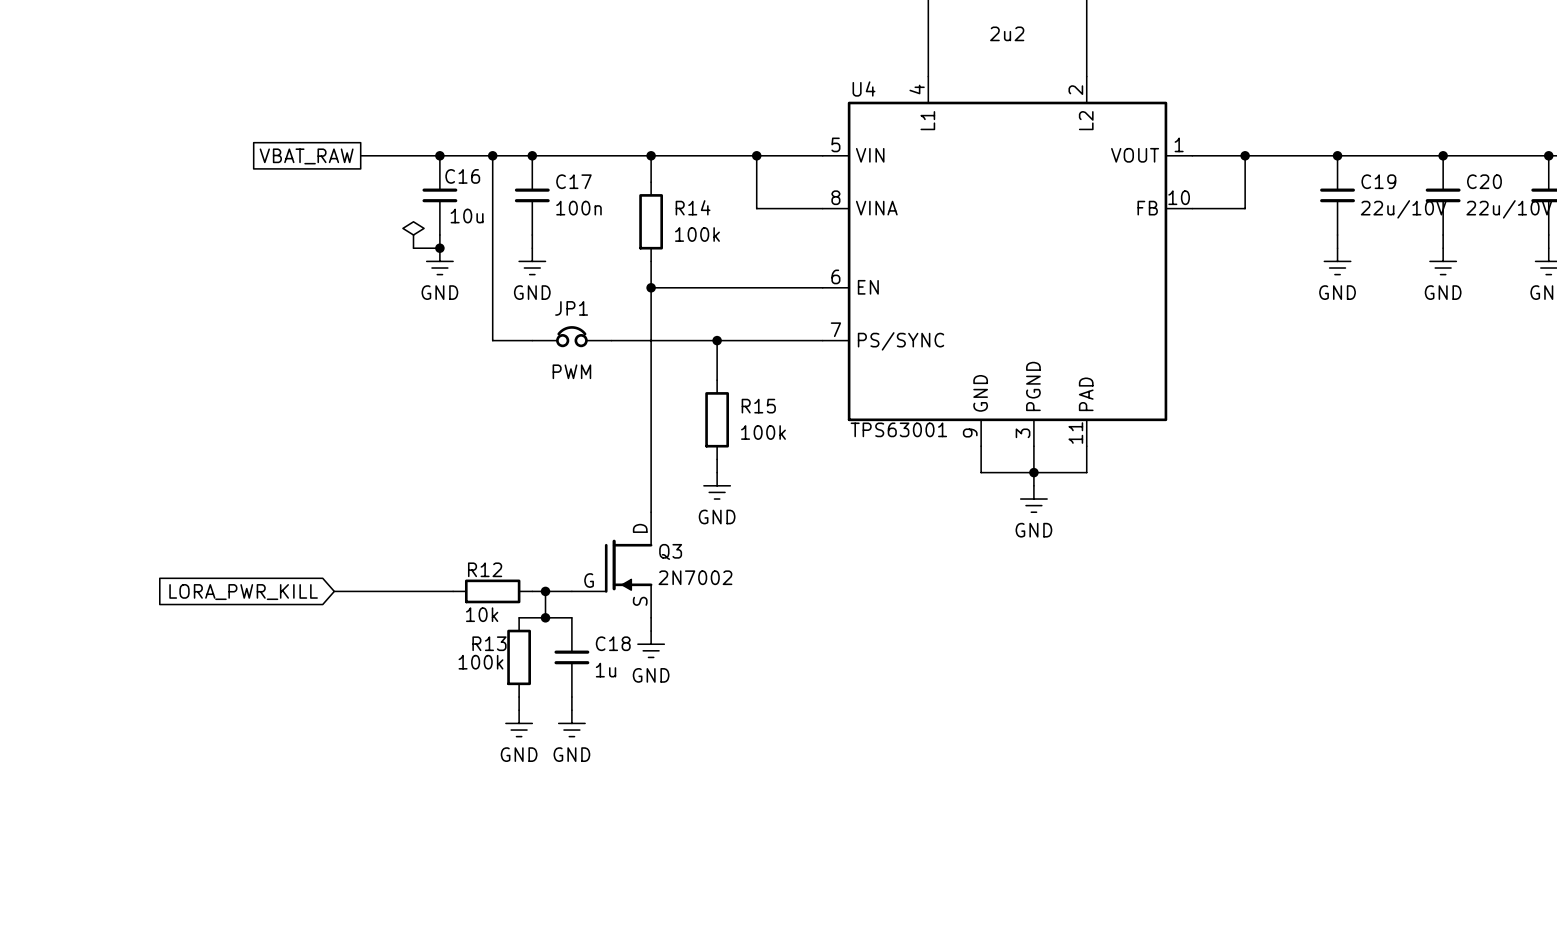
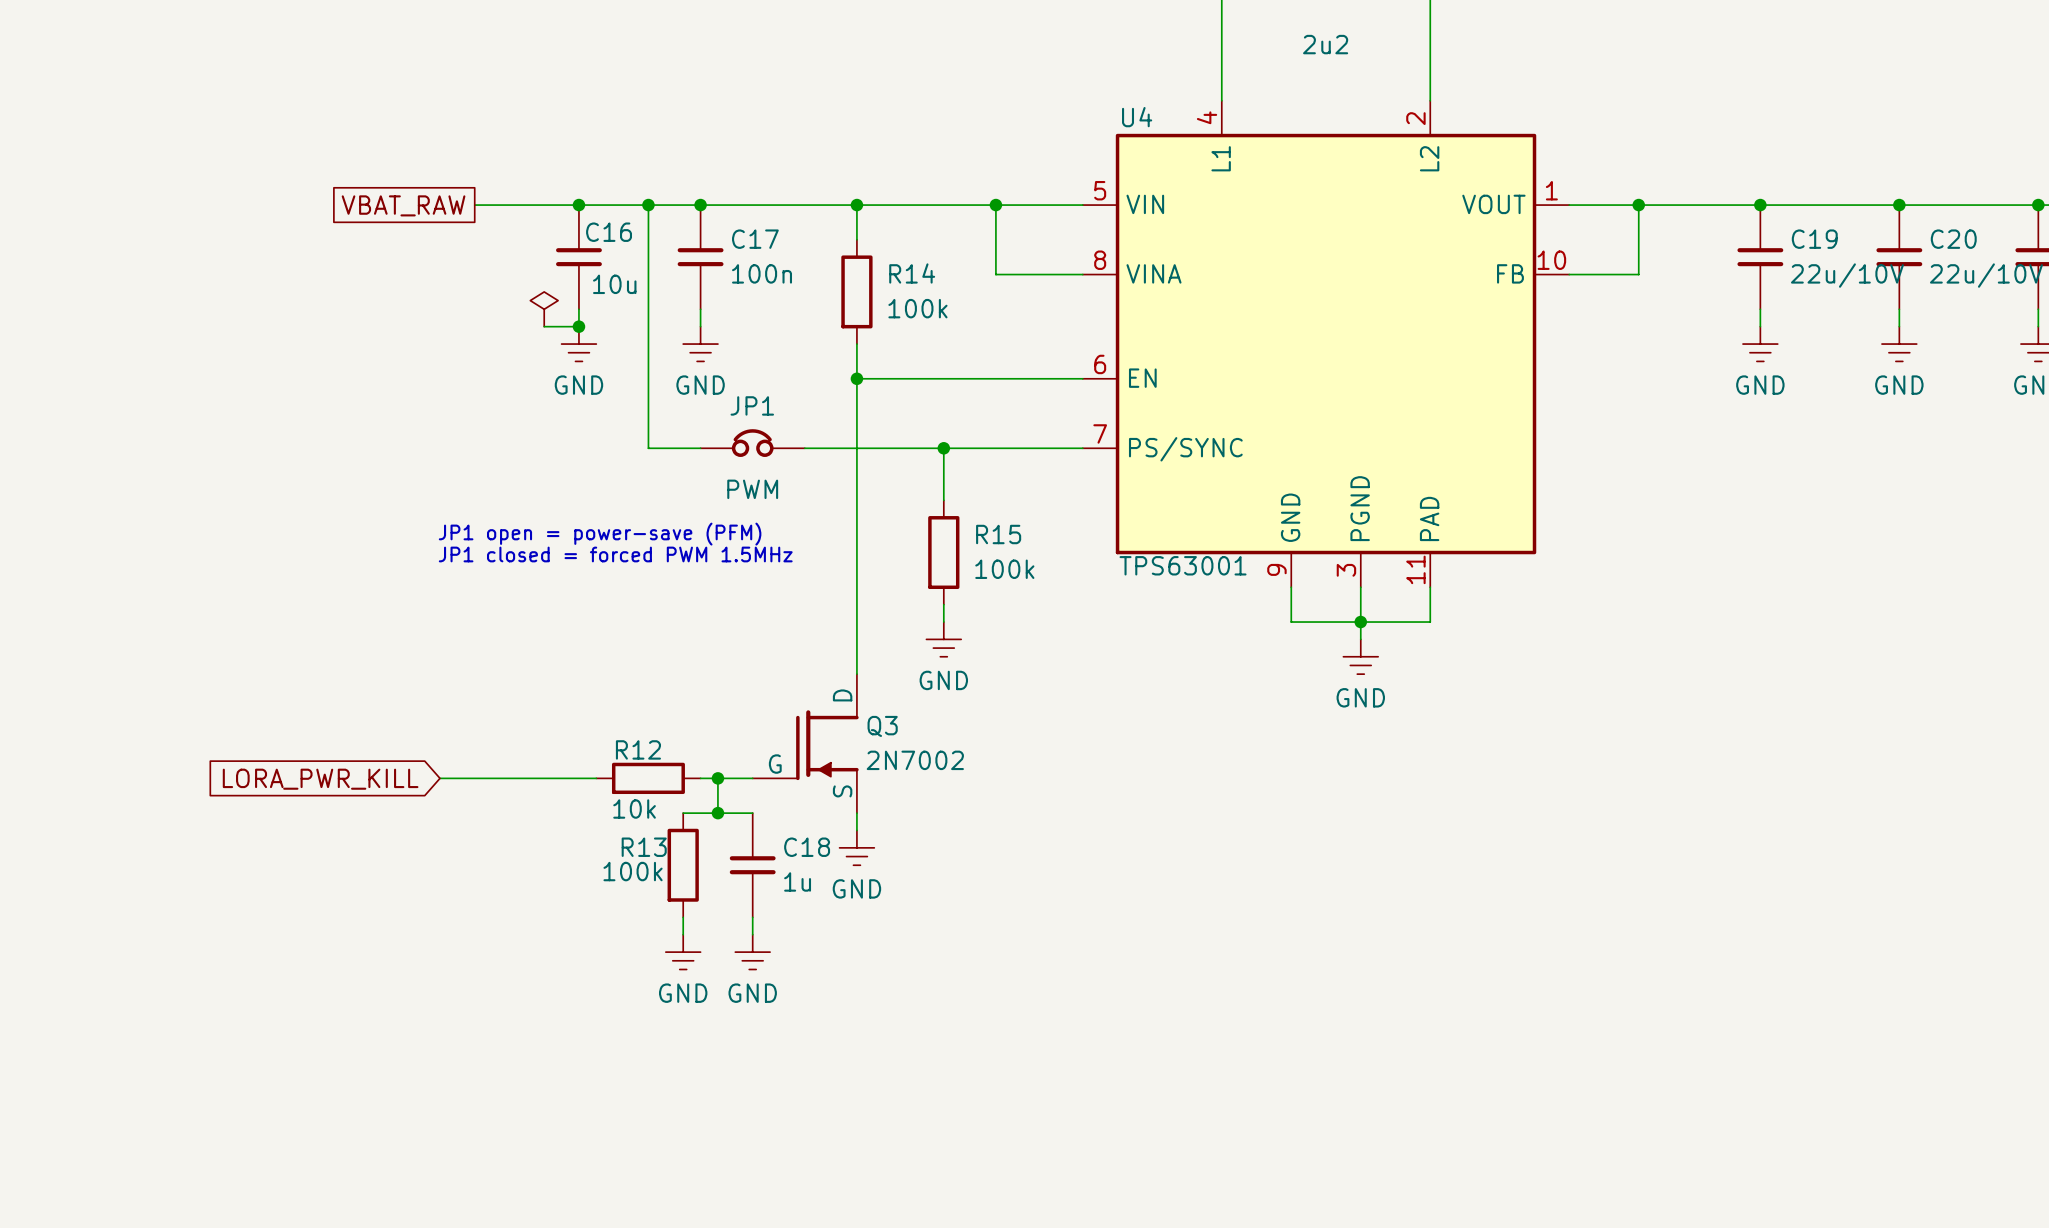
text: none -> JP1 open = power-save (PFM) (600, 534)
text: none -> JP1 closed = forced PWM 1.5MHz (615, 554)

